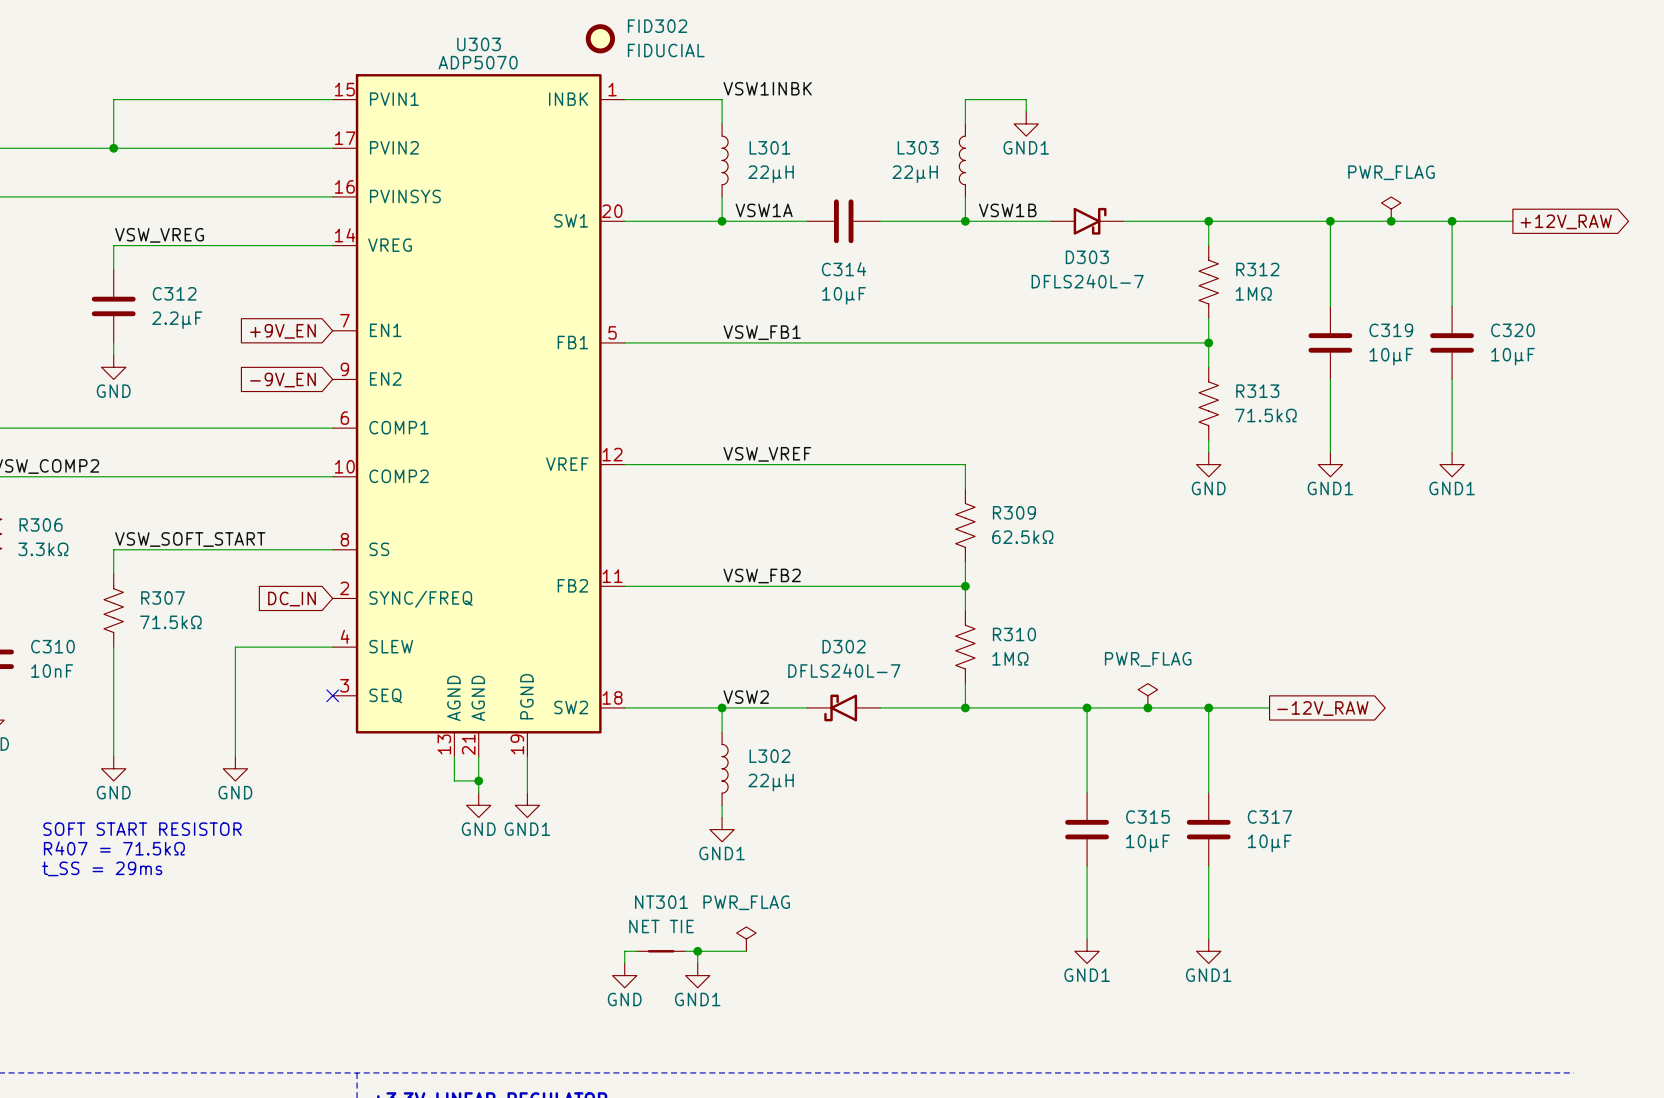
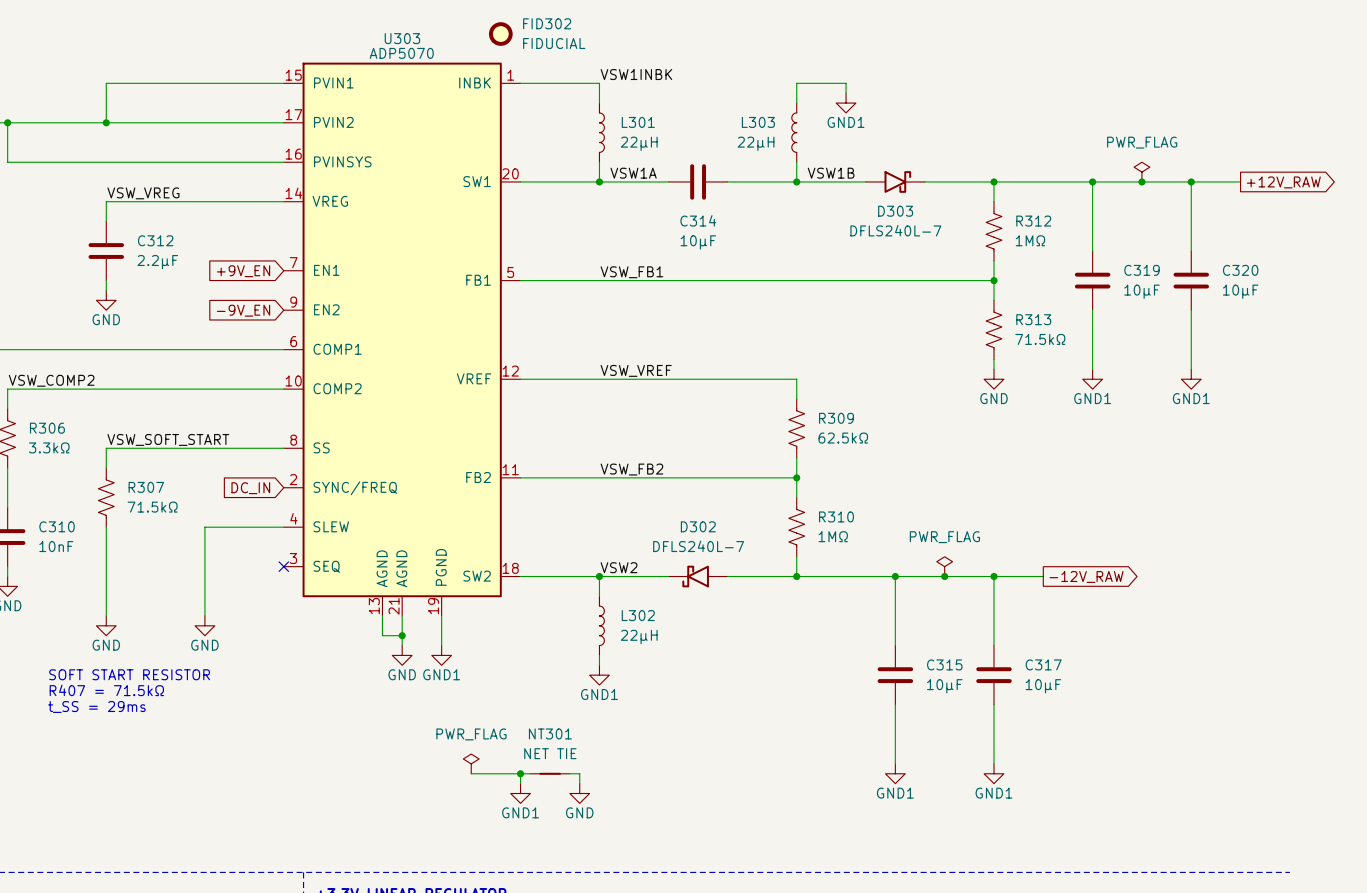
power symbol position: PWR_FLAG (746, 939) -> PWR_FLAG (471, 763)
wire: none -> (471, 773) (520, 773)
junction: none -> (520, 773)
wire: (697, 951) (746, 951) -> none
junction: (697, 951) -> none
power symbol: GND (624, 975) -> GND1 (520, 793)
power symbol: GND1 (697, 975) -> GND (579, 793)

